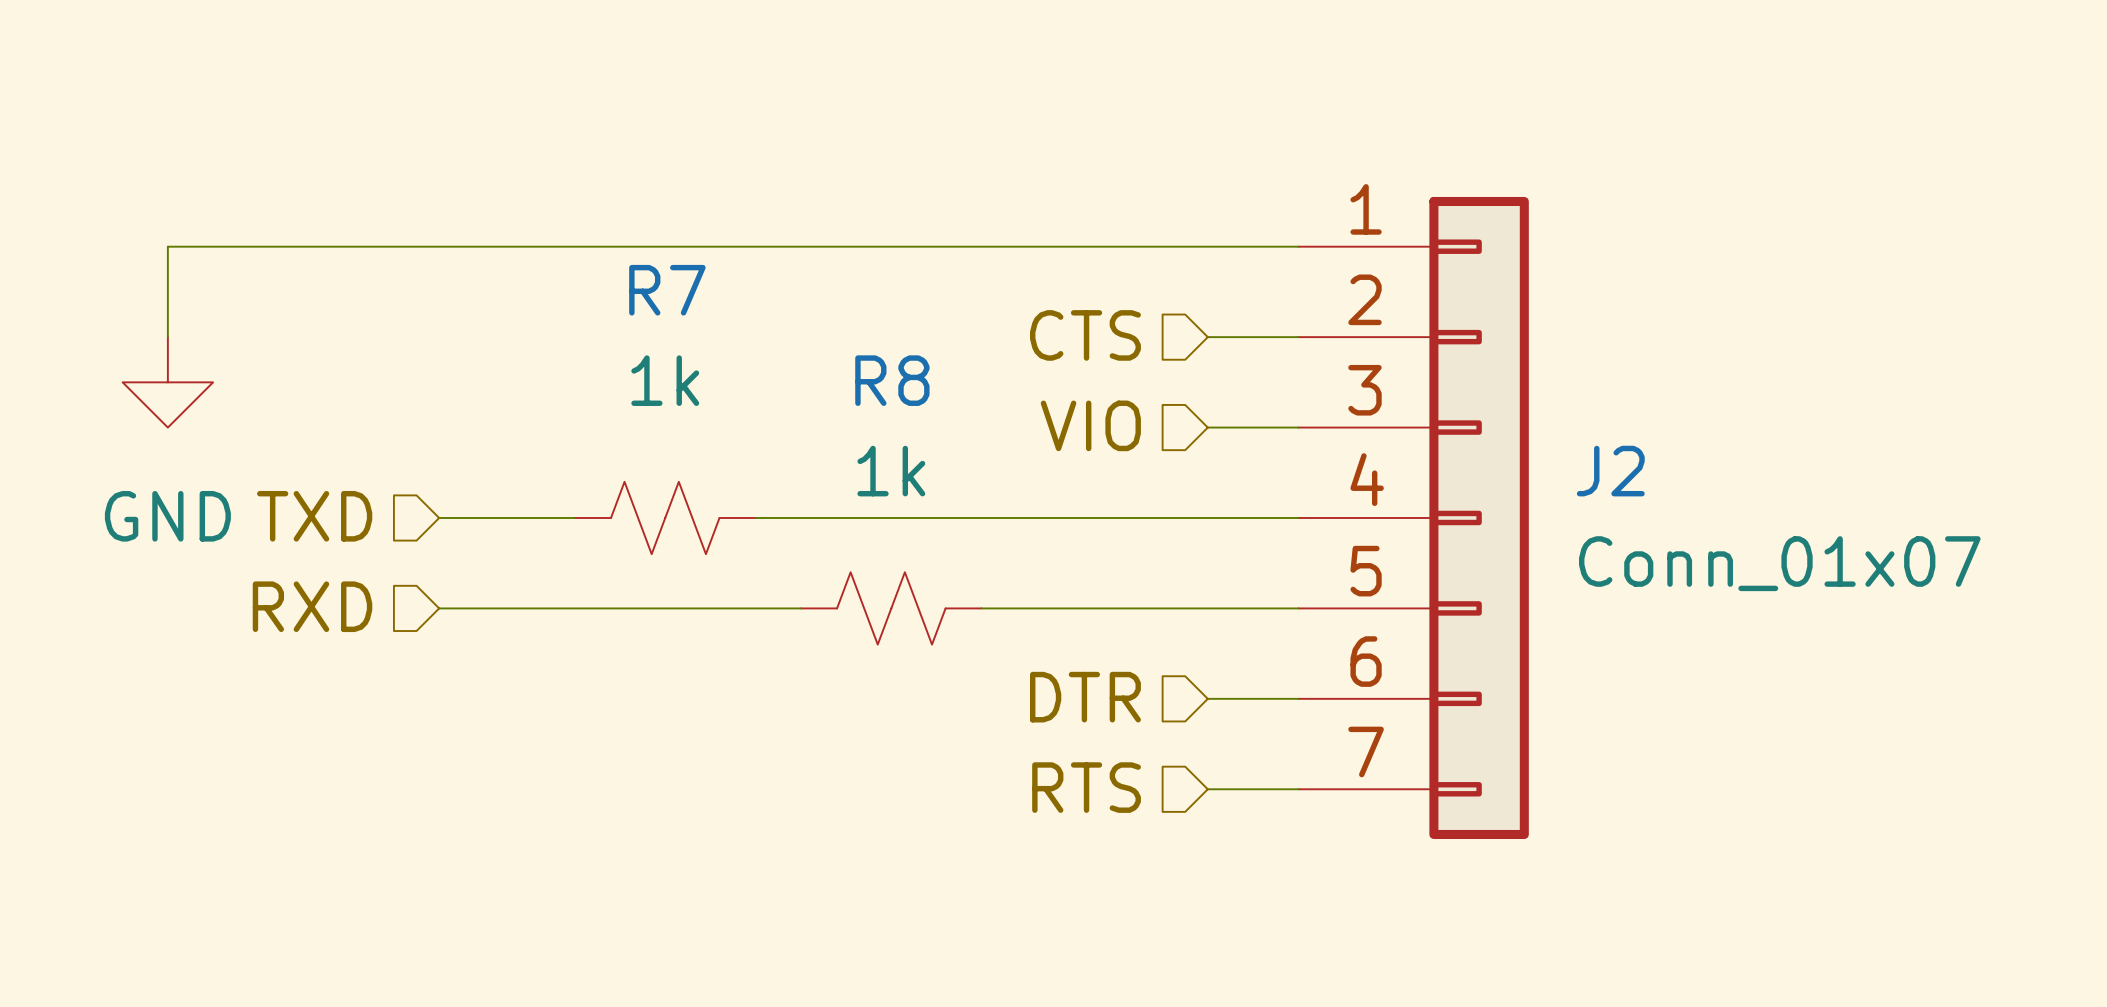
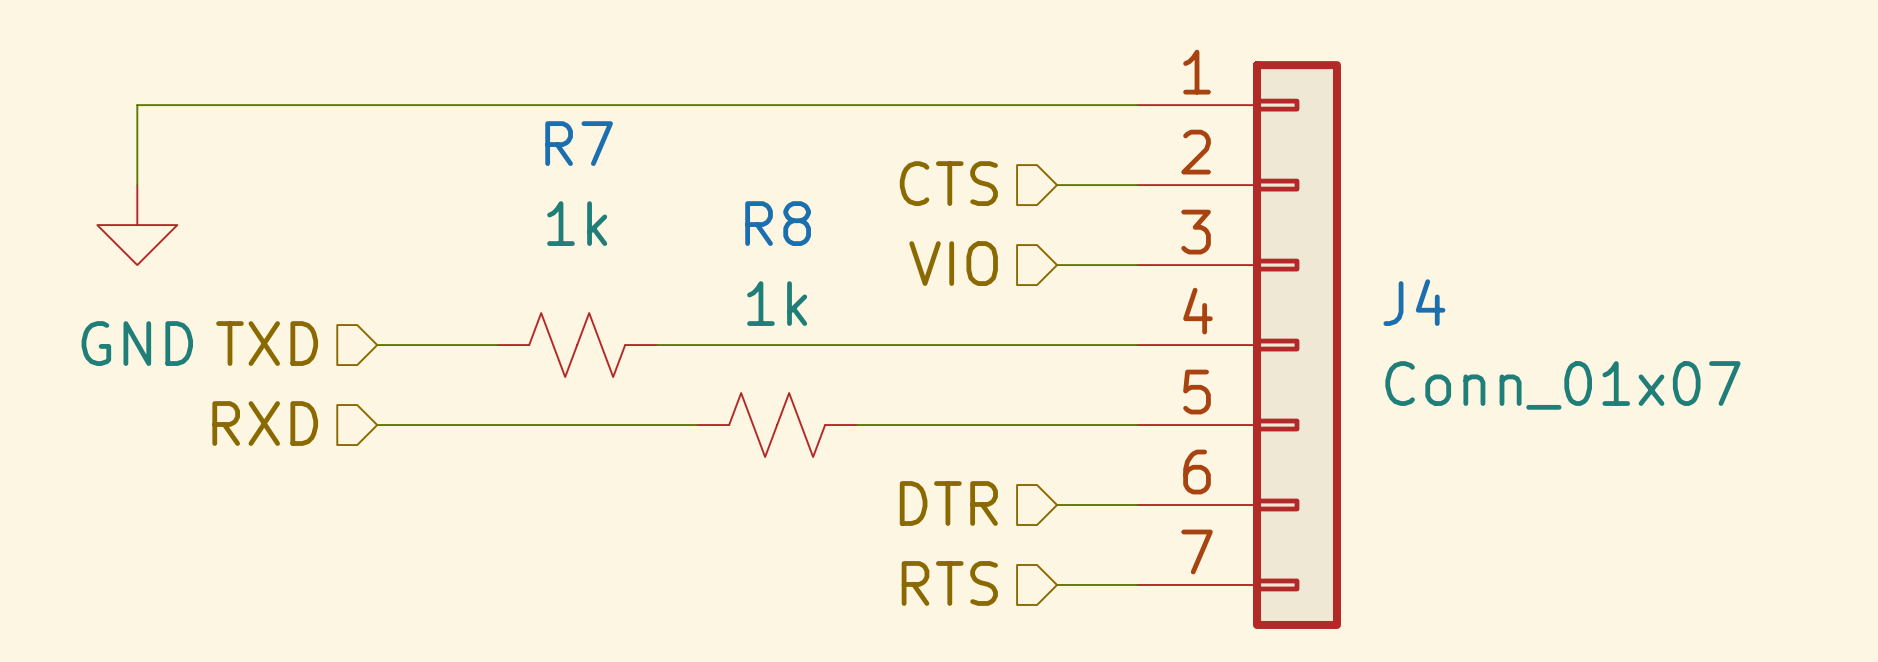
J2 name: J2 (1610, 471) -> J4 (1414, 302)

